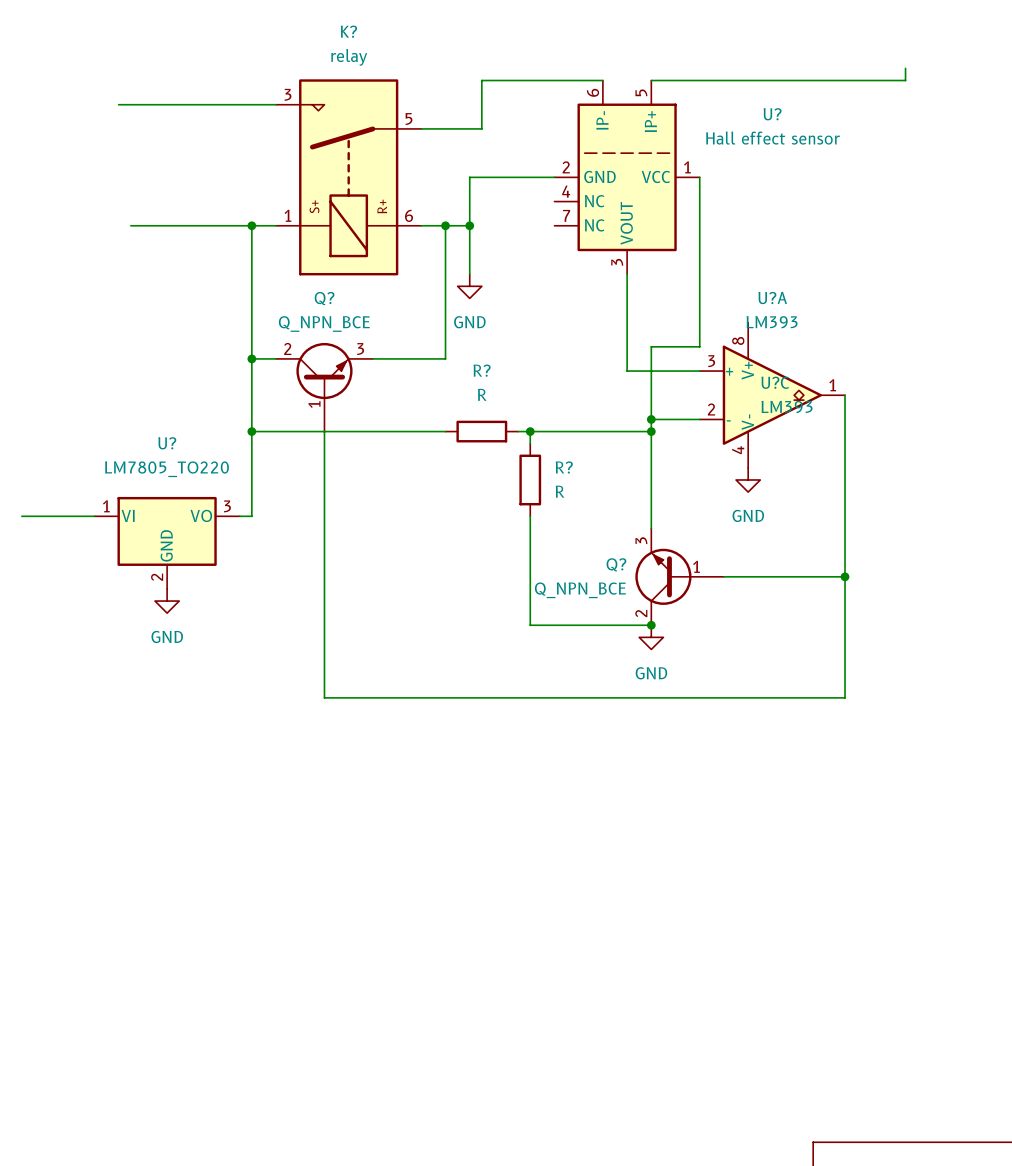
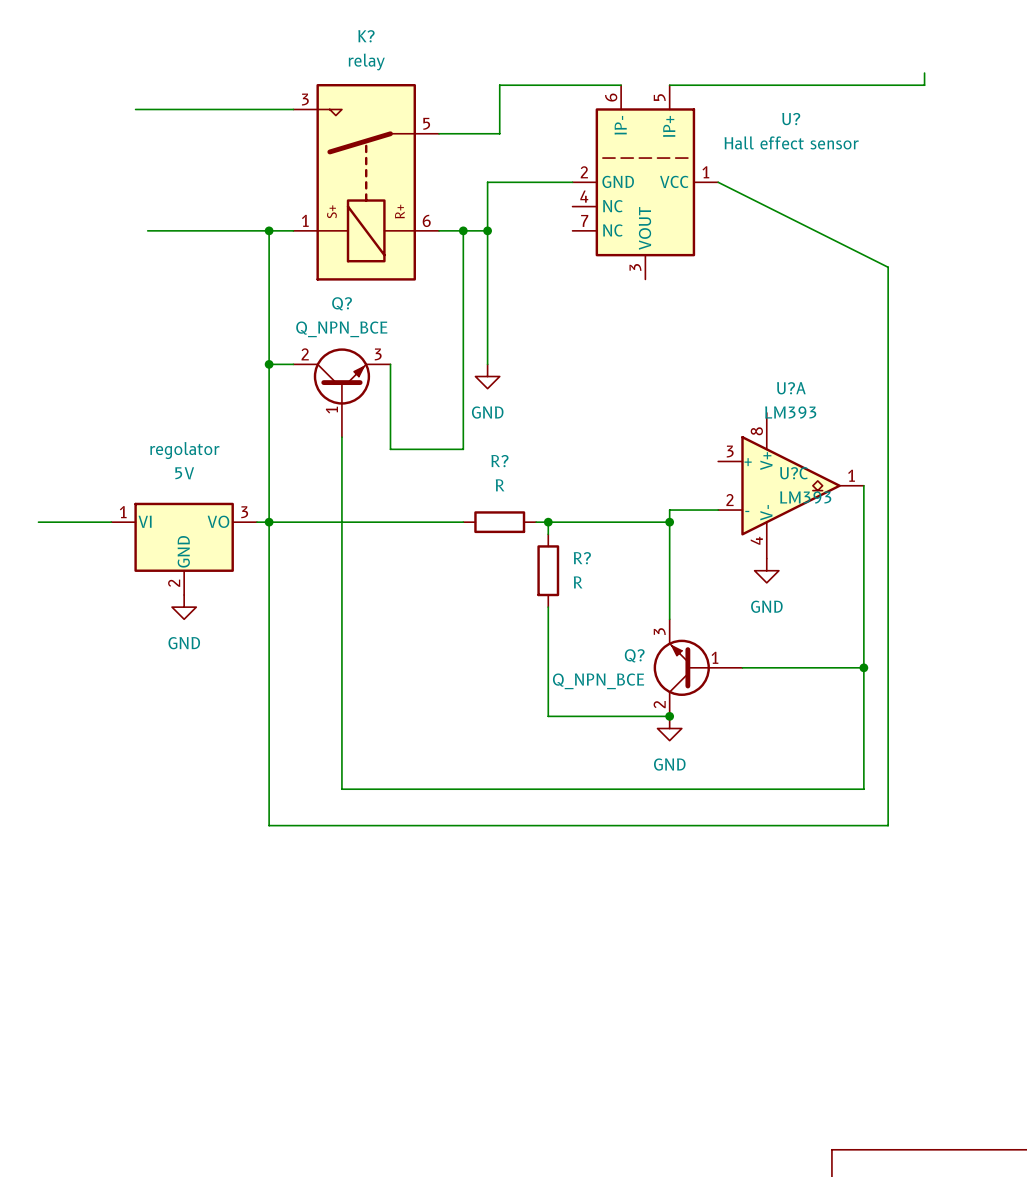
wire: (699, 177) (699, 346) (651, 346) (651, 504) -> (718, 182) (888, 267) (888, 825) (269, 825) (269, 522) (463, 522)
wire: none -> (487, 279) (487, 364)
wire: (627, 274) (627, 371) (699, 371) -> none
power symbol position: GND (469, 286) -> GND (487, 376)
wire: (372, 358) (445, 358) -> (390, 364) (390, 449) (463, 449) (463, 364)
U?C position: (748, 395) -> (766, 485)
U?A position: (772, 395) -> (791, 485)
wire: (845, 395) (845, 479) -> (669, 534) (669, 619)
wire: (651, 419) (699, 419) -> (669, 510) (718, 510)
junction: (651, 419) -> none
wire: (251, 431) (445, 431) -> none
junction: (251, 431) -> none
R?: R (481, 431) -> none
wire: (518, 431) (651, 431) -> (536, 522) (669, 522)
wire: (530, 431) (530, 443) -> none
junction: (530, 431) -> none
junction: (651, 431) -> none
U? name: U? (167, 443) -> regolator (184, 450)
U? value: LM7805_TO220 (166, 469) -> 5V (184, 473)
R?: R (530, 479) -> none
power symbol: GND (748, 479) -> none
junction: none -> (269, 522)
R?: none -> R (499, 522)
junction: none -> (548, 522)
junction: none -> (669, 522)
wire: (530, 528) (530, 601) -> none
R?: none -> R (548, 570)
power symbol: none -> GND (766, 570)
Q? position: (679, 576) -> (698, 667)
wire: (723, 576) (845, 576) -> (742, 667) (863, 667)
junction: (845, 576) -> none
wire: (530, 625) (651, 625) -> (548, 631) (548, 716) (669, 716)
junction: (651, 625) -> none
power symbol: GND (651, 637) -> none
junction: none -> (863, 667)
wire: (324, 697) (845, 697) -> (341, 704) (341, 789) (863, 789) (863, 704)
junction: none -> (669, 716)
power symbol: none -> GND (669, 728)

